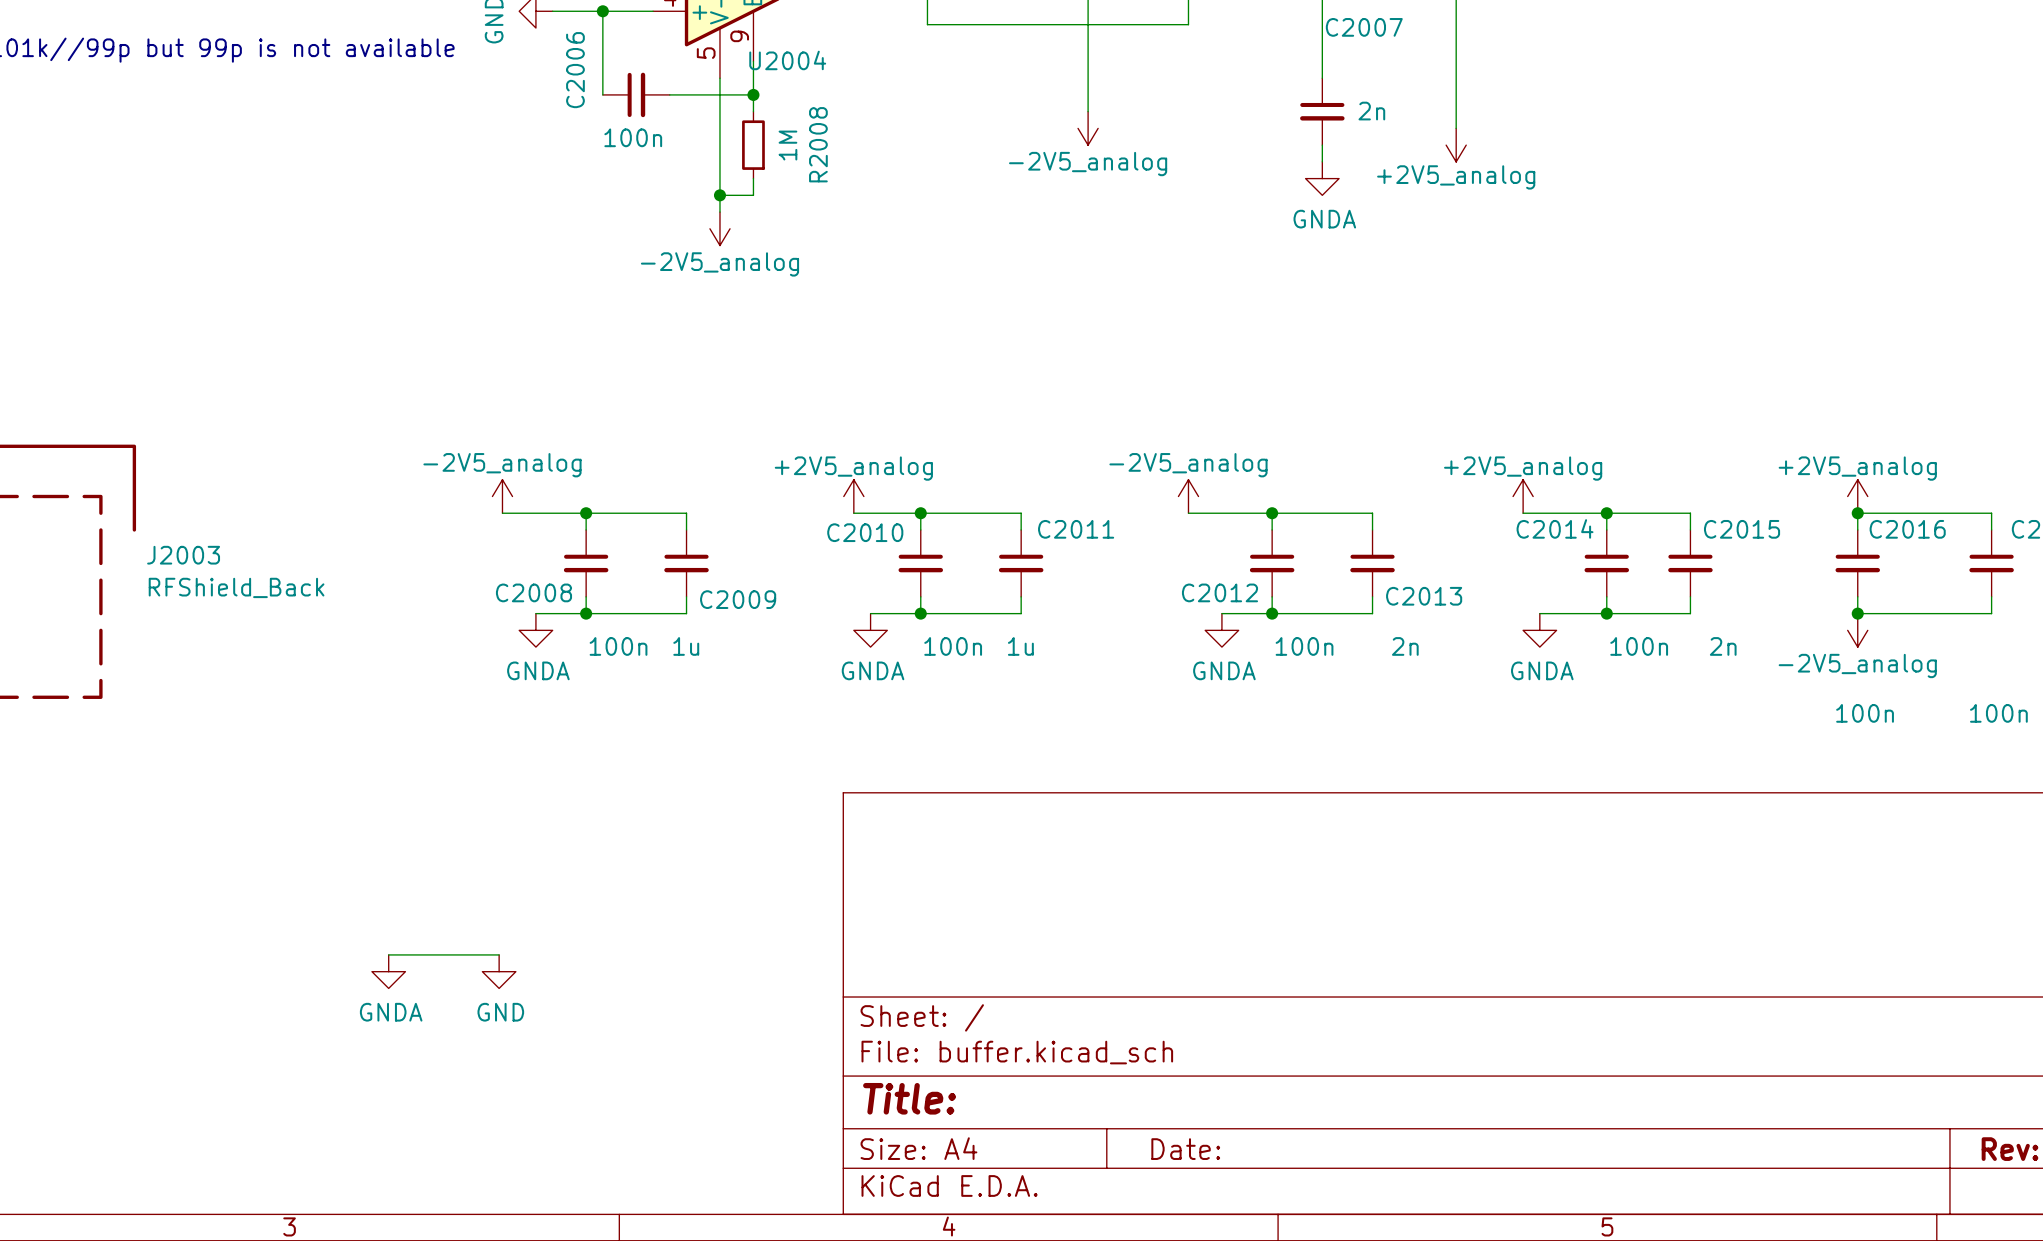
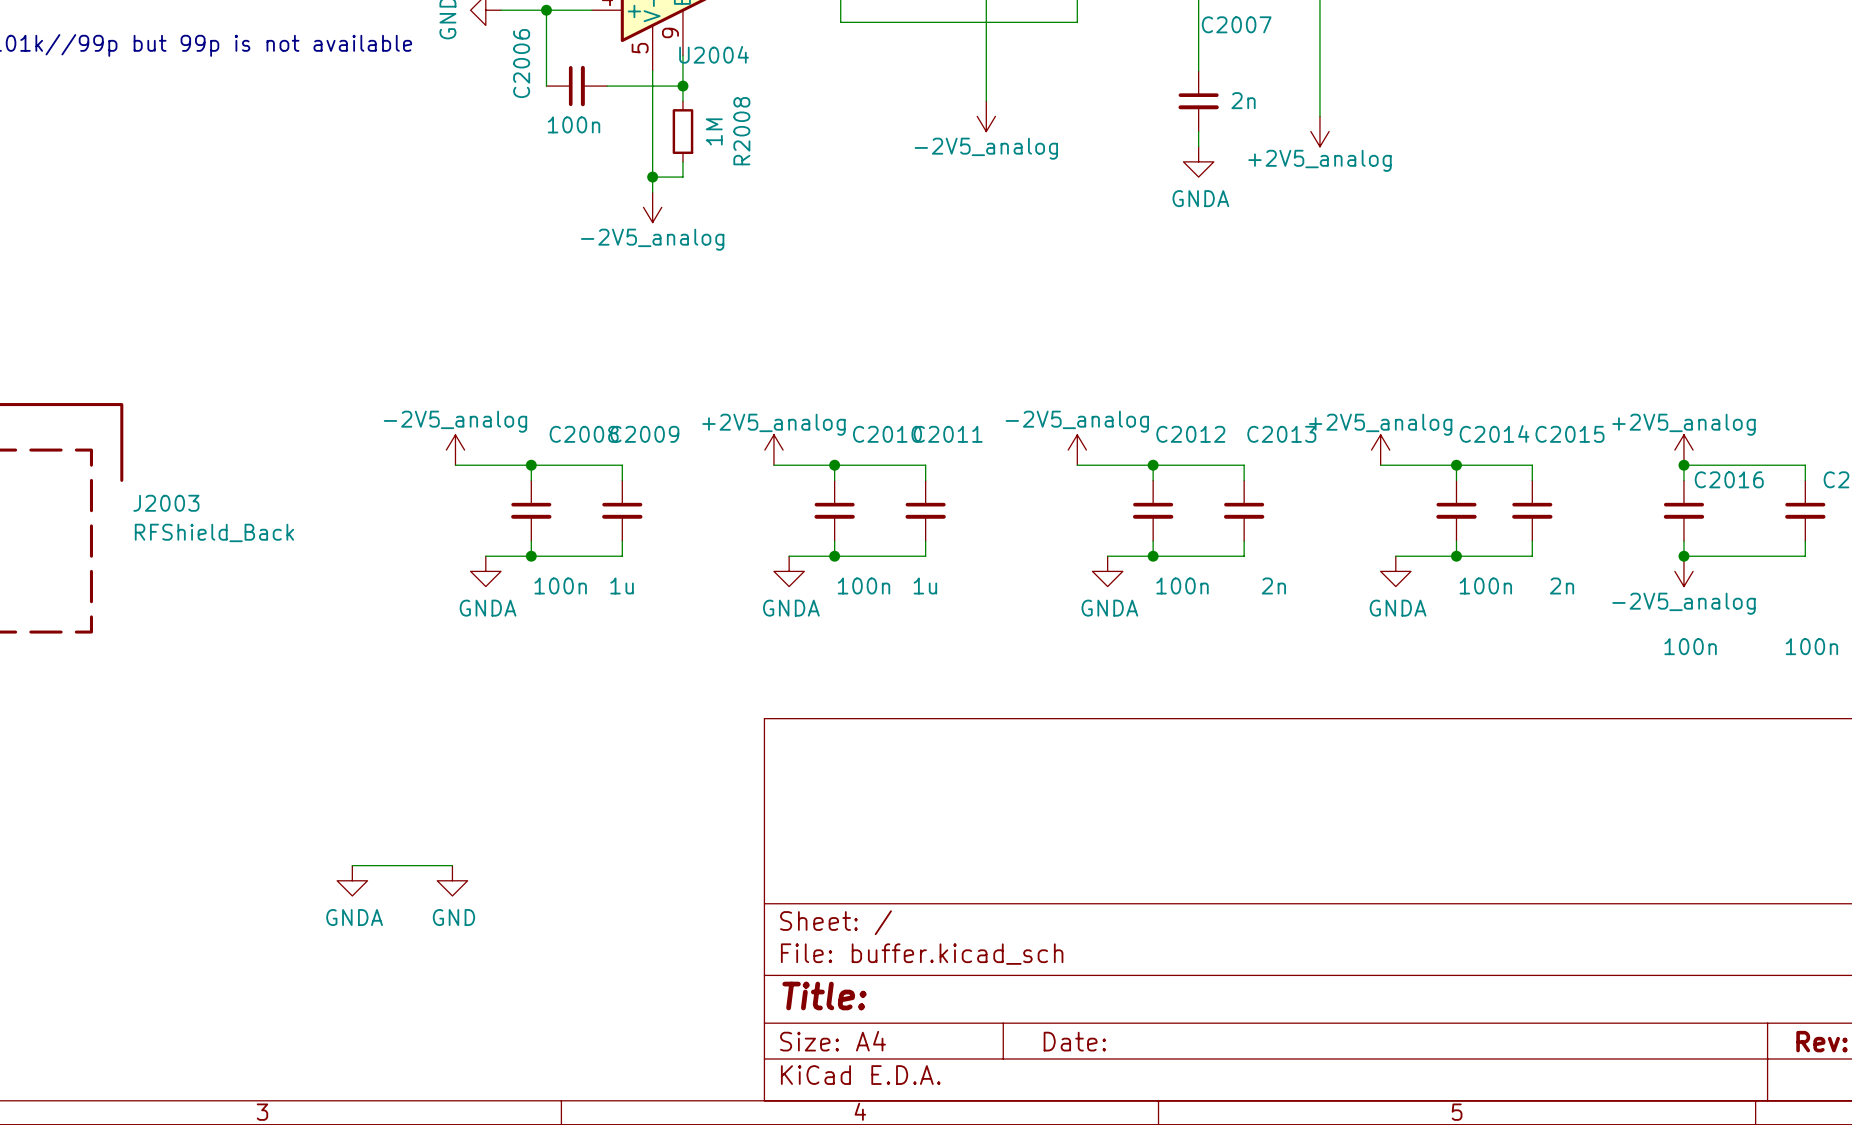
C2014 name position: C2014 (1555, 528) -> C2014 (1494, 433)
C2011 name position: C2011 (1076, 529) -> C2011 (948, 434)
C2015 name position: C2015 (1742, 529) -> C2015 (1569, 434)
C2010 name position: C2010 (865, 532) -> C2010 (887, 434)
C2008 name position: C2008 (533, 592) -> C2008 (584, 434)
C2012 name position: C2012 (1219, 592) -> C2012 (1190, 434)
C2013 name position: C2013 (1424, 596) -> C2013 (1281, 434)
C2009 name position: C2009 (738, 599) -> C2009 (644, 434)

